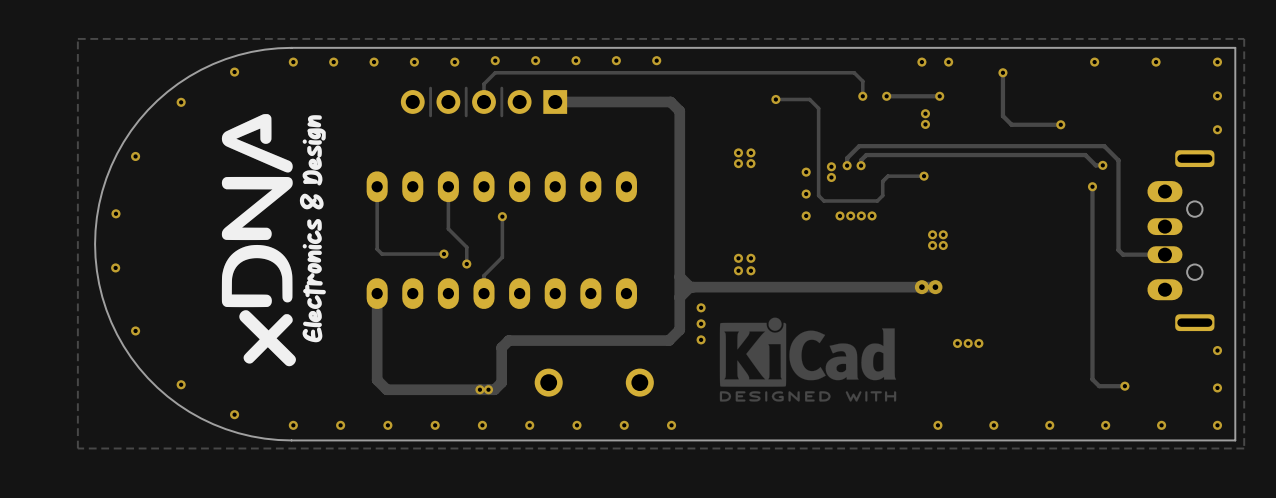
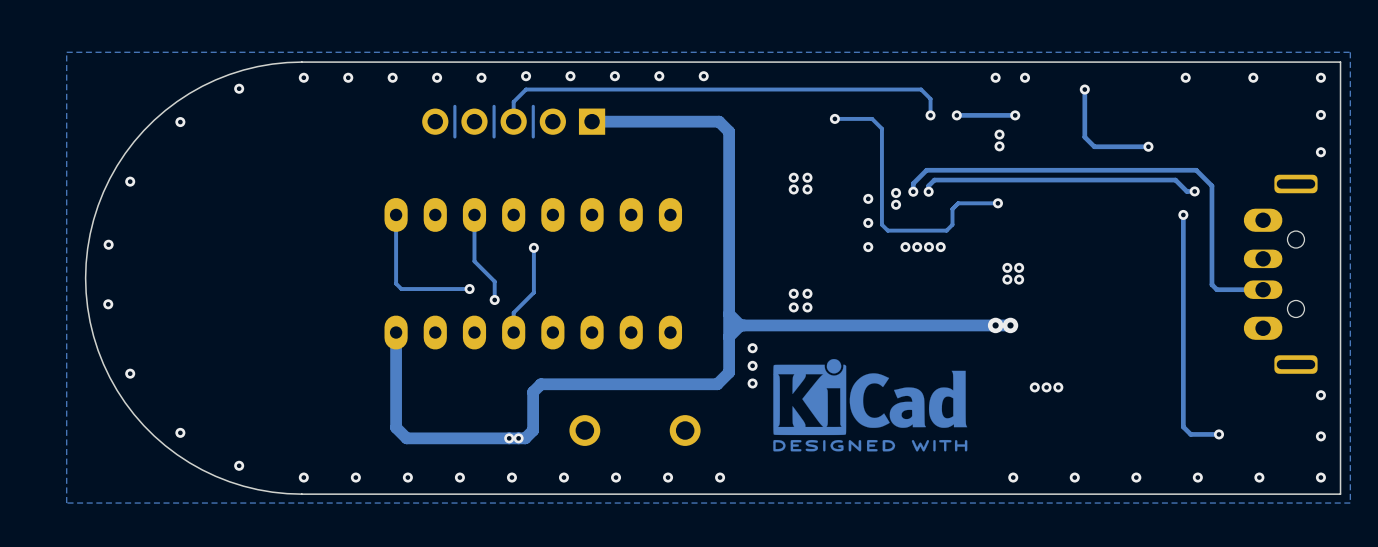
drawing: [221, 114, 326, 367] -> none

